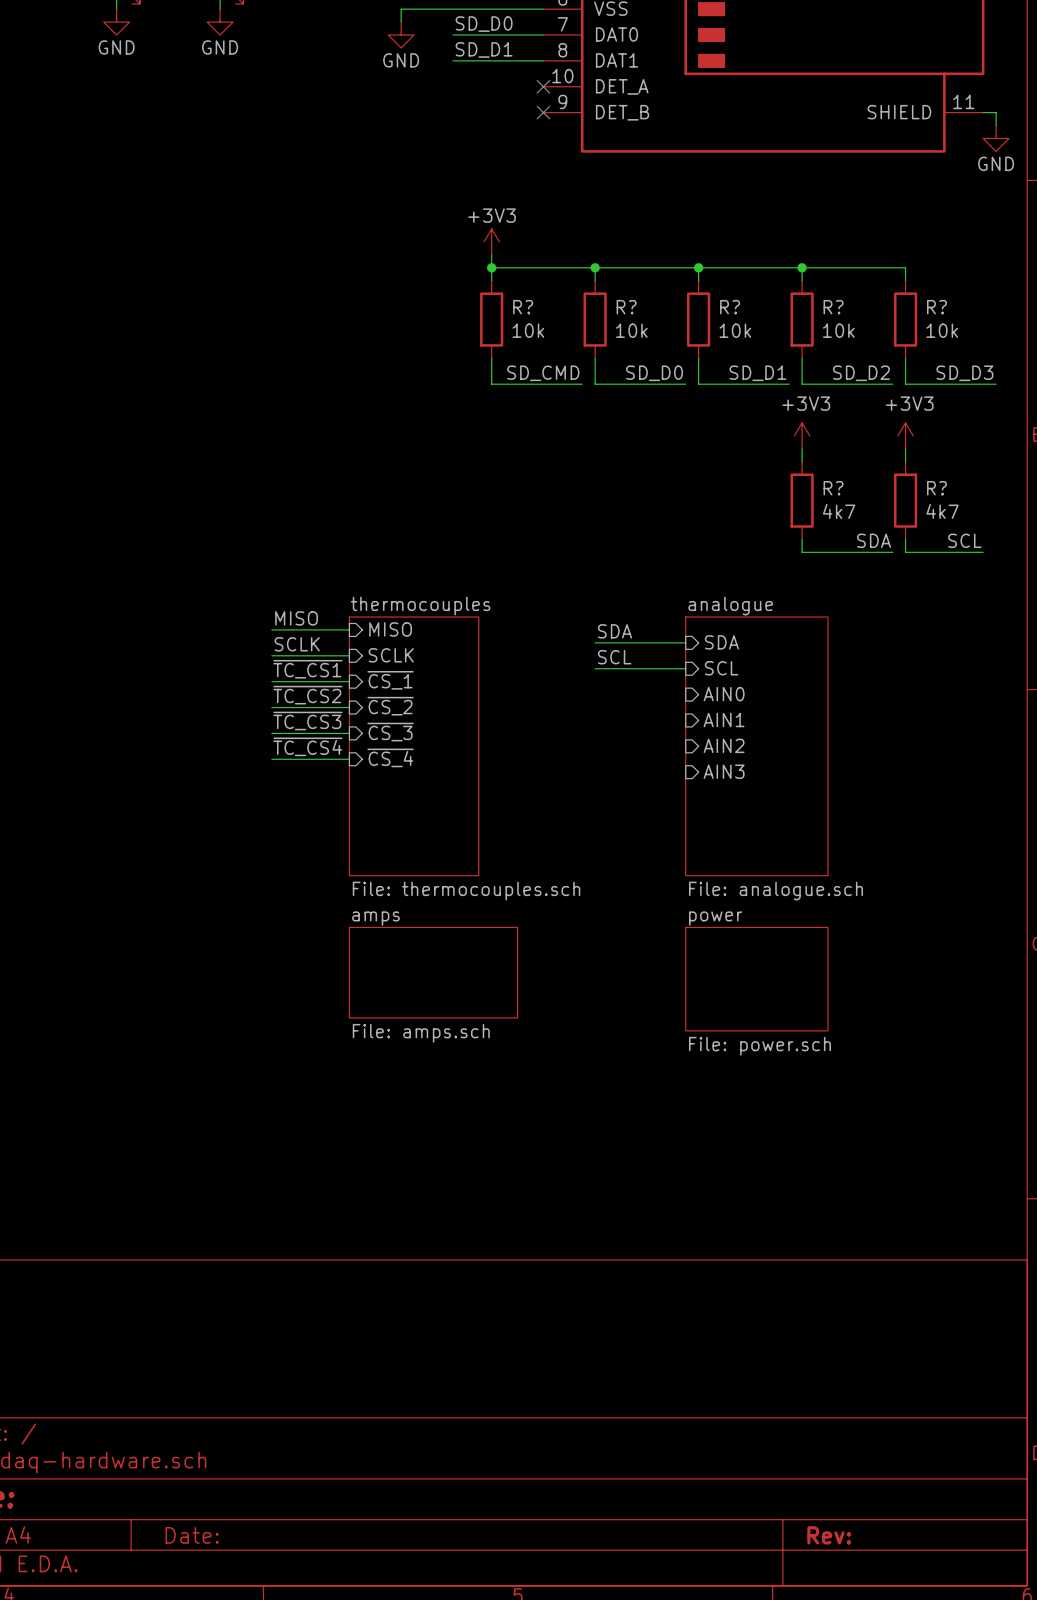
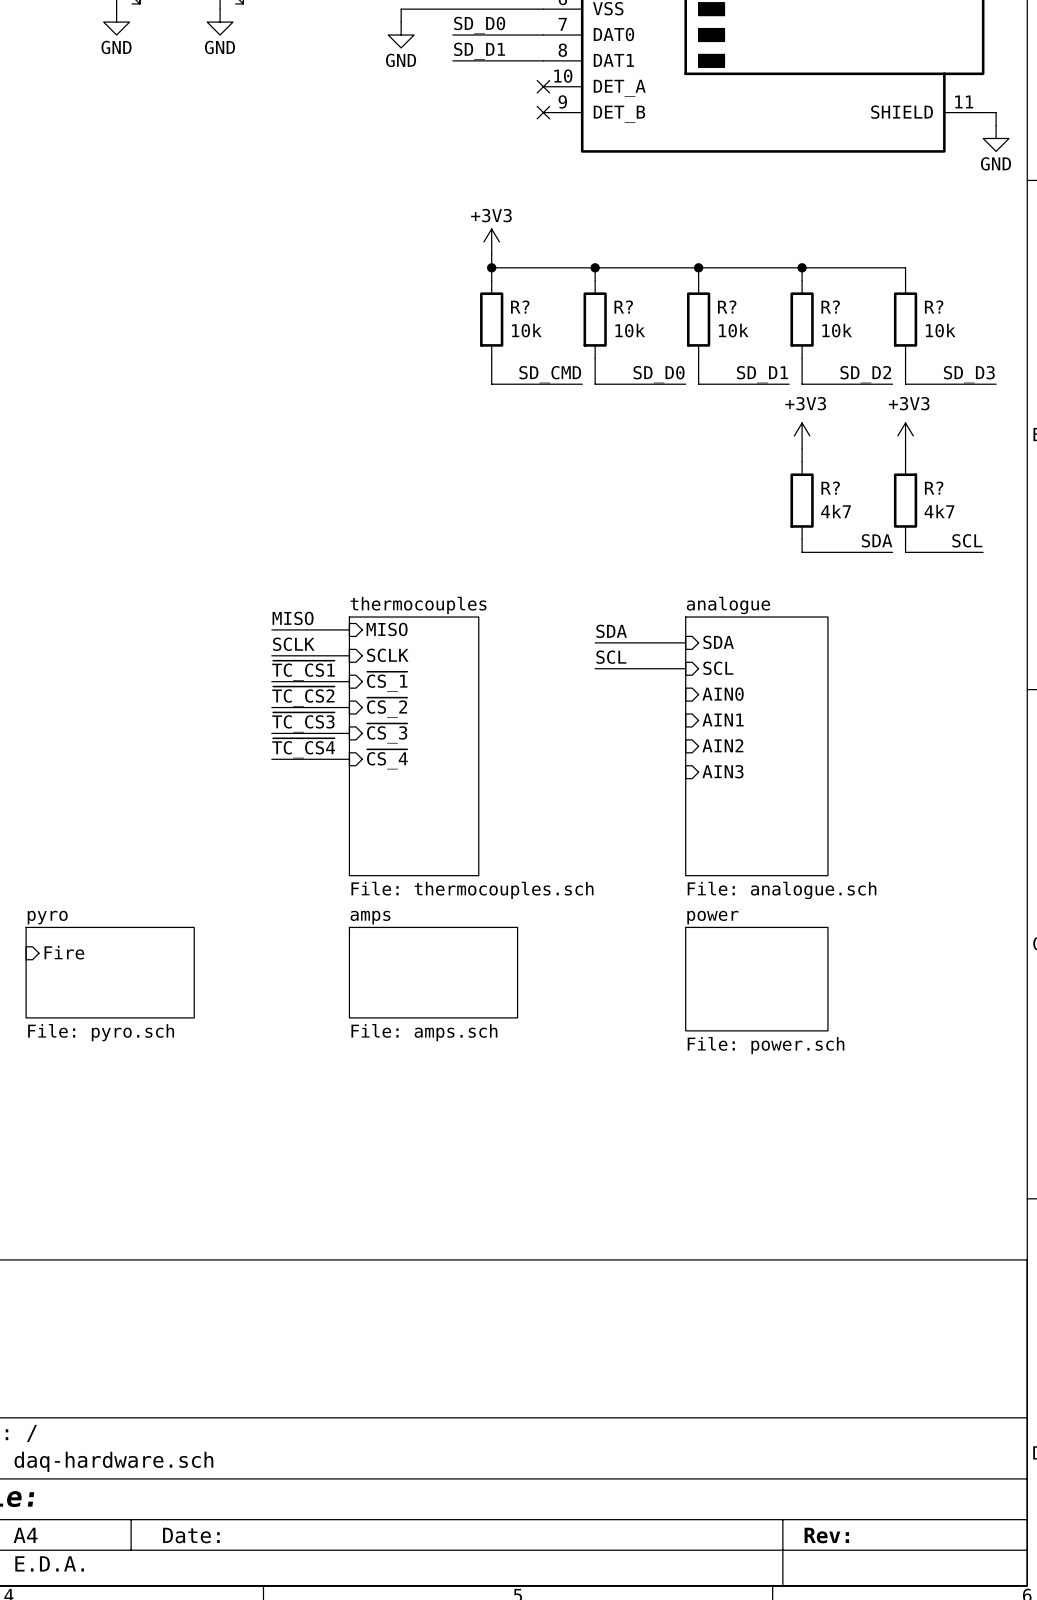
sheet pin: none -> Fire (64, 952)
sheet pyro: none -> File: pyro.sch (110, 972)

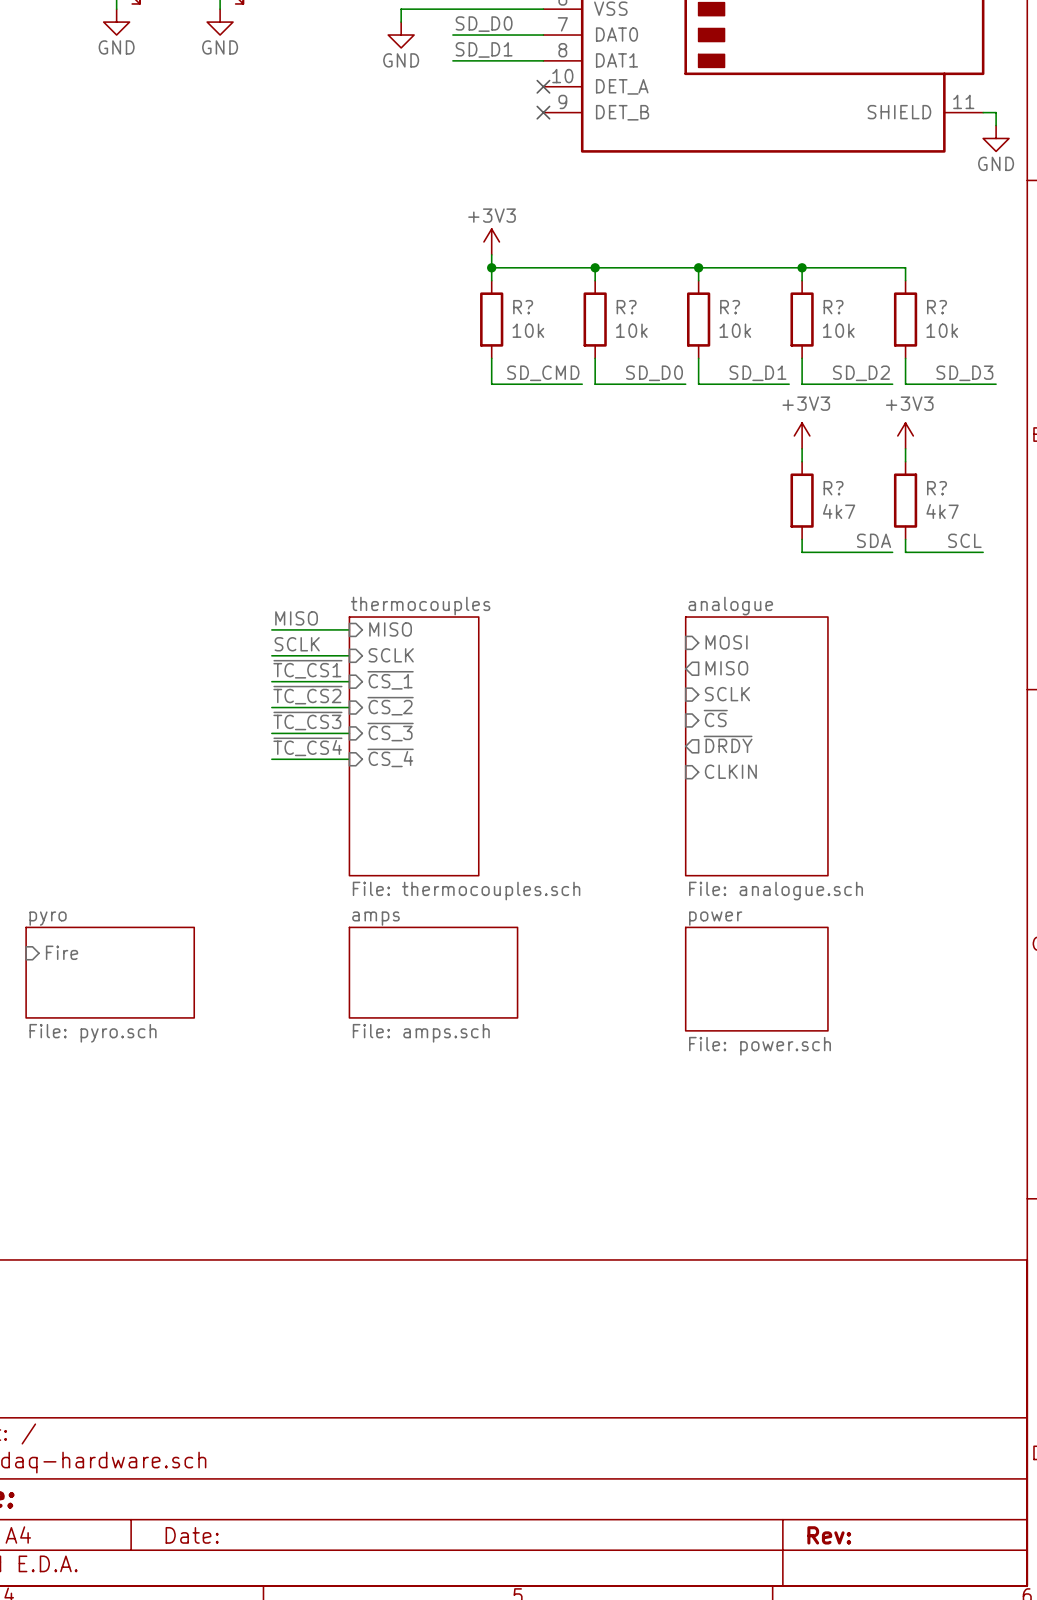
label: SDA (611, 631) -> none
wire: (595, 642) (685, 642) -> none
sheet pin: SDA (718, 642) -> MOSI (726, 642)
label: SCL (611, 657) -> none
wire: (595, 668) (685, 668) -> none
sheet pin shape: input (718, 668) -> output (726, 668)
sheet pin: SCL (718, 668) -> MISO (726, 668)
sheet pin: AIN0 (723, 694) -> SCLK (727, 694)
sheet pin: AIN1 (723, 719) -> ~{CS} (715, 718)
sheet pin shape: input (722, 745) -> output (728, 744)
sheet pin: AIN2 (722, 745) -> ~{DRDY} (728, 744)
sheet pin: AIN3 (722, 771) -> CLKIN (730, 771)

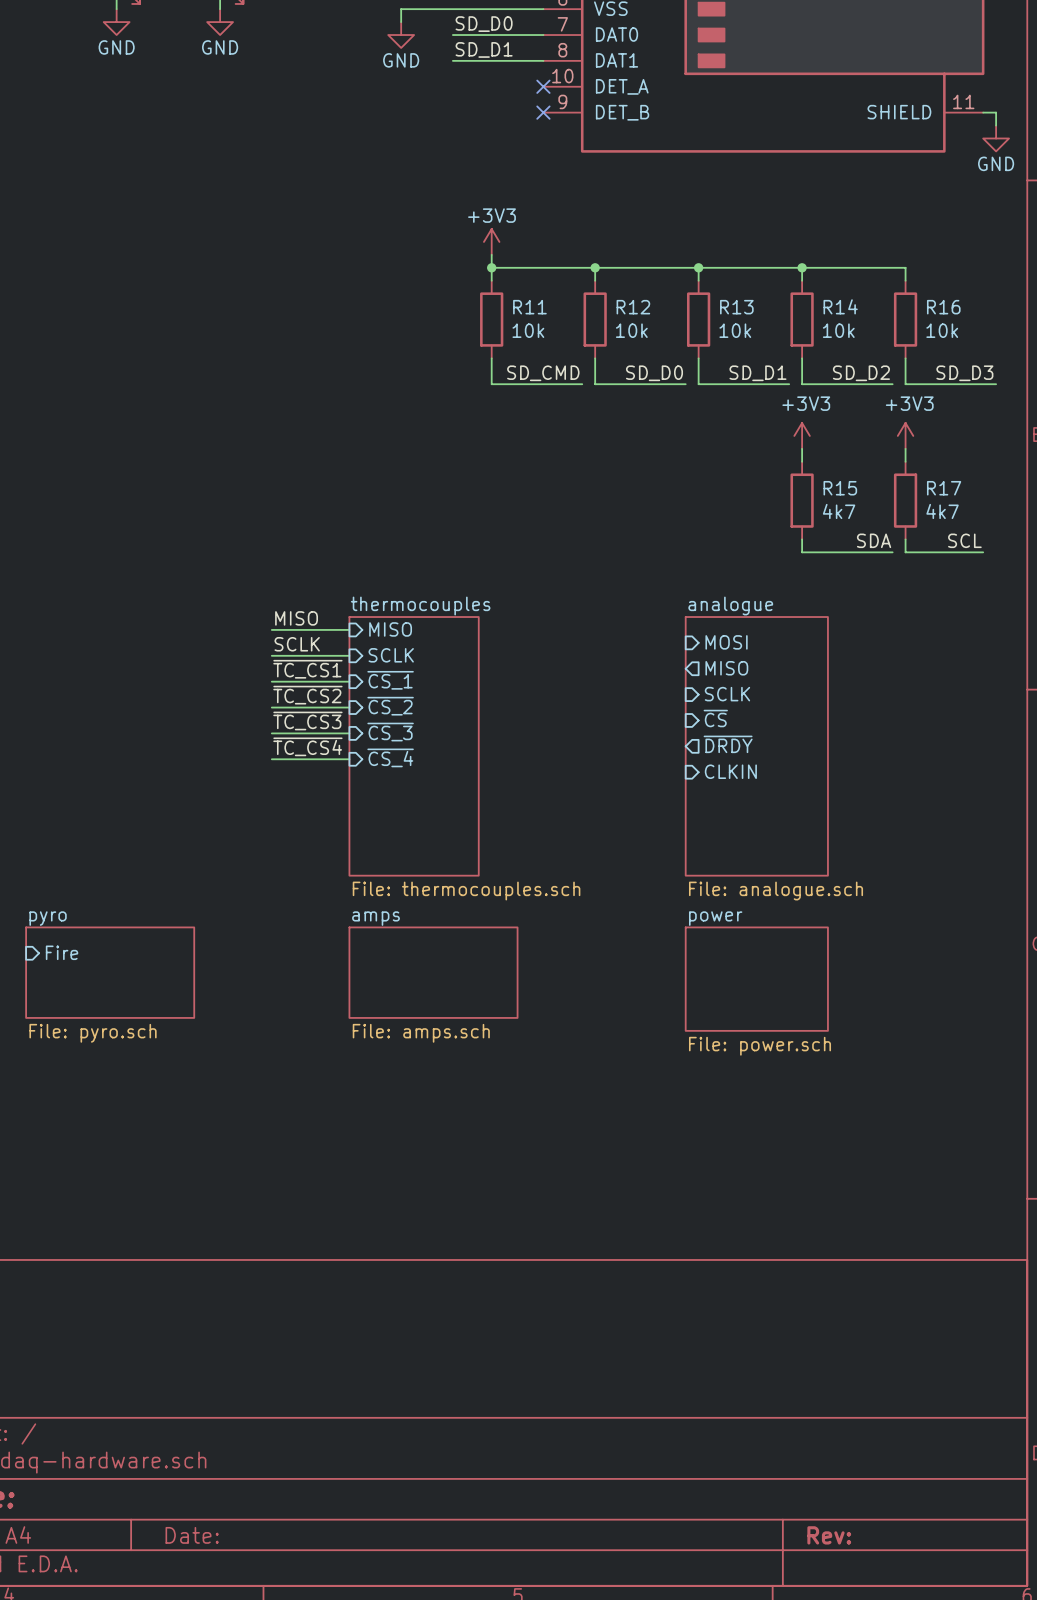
R? name: R? (523, 307) -> R11 (529, 307)
R? name: R? (626, 307) -> R12 (633, 307)
R? name: R? (730, 307) -> R13 (736, 307)
R? name: R? (833, 307) -> R14 (840, 306)
R? name: R? (937, 307) -> R16 (943, 307)
R? name: R? (833, 488) -> R15 (840, 488)
R? name: R? (937, 488) -> R17 (944, 488)

